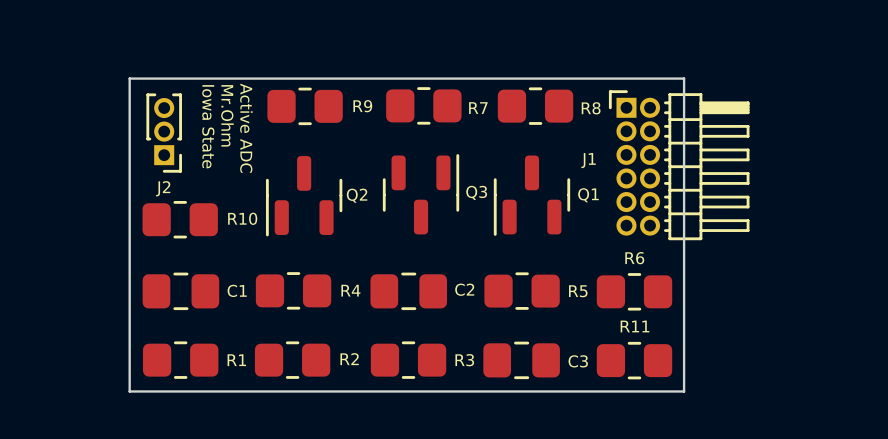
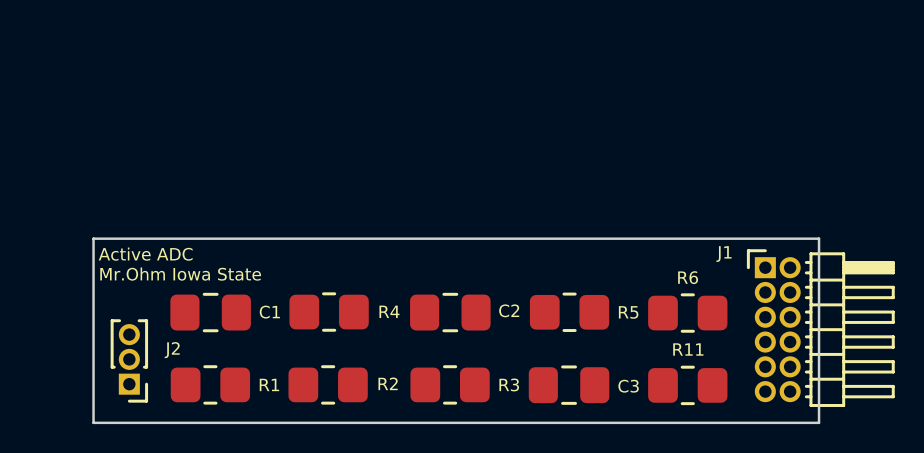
board edge: (129, 78) (684, 78) (684, 391) (129, 391) (129, 78) -> none
R7: (423, 105) -> none
R9: (305, 106) -> none
R8: (535, 106) -> none
text: Mr.Ohm (227, 115) -> none
text: Iowa State (208, 126) -> none
text rotation: 0° (246, 128) -> 90° counterclockwise (145, 254)
text position: Active ADC (246, 128) -> Active ADC (145, 254)
J2 position: (164, 133) -> (129, 360)
J1 name position: J1 (588, 160) -> J1 (723, 254)
J1 position: (679, 165) -> (820, 328)
J2 name position: J2 (163, 188) -> J2 (172, 350)
Q3: (421, 194) -> none
Q1: (531, 195) -> none
Q2: (304, 196) -> none
R10: (180, 219) -> none
board edge: none -> (93, 238) (819, 238) (819, 422) (93, 422) (93, 238)
text: none -> Mr.Ohm Iowa State (180, 274)

